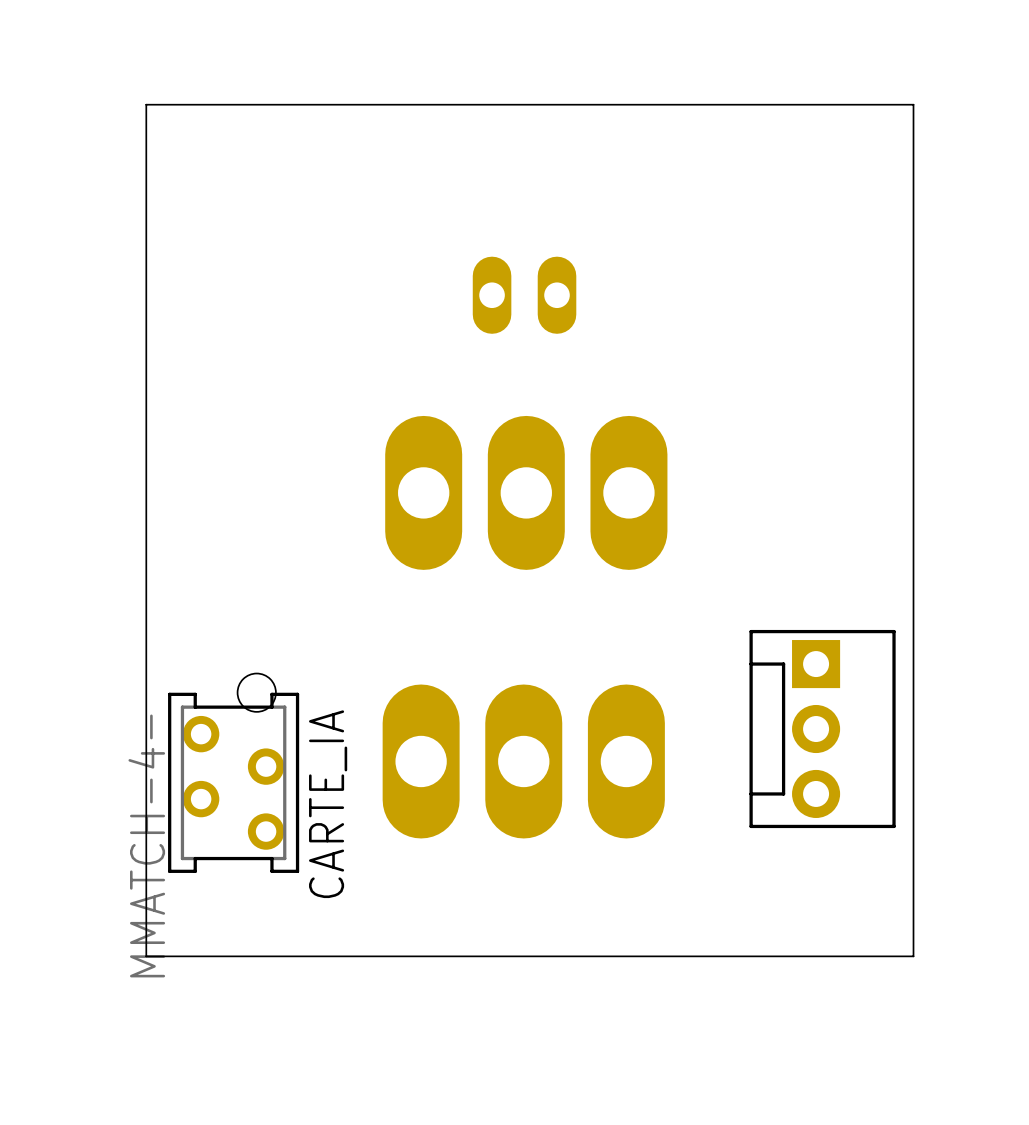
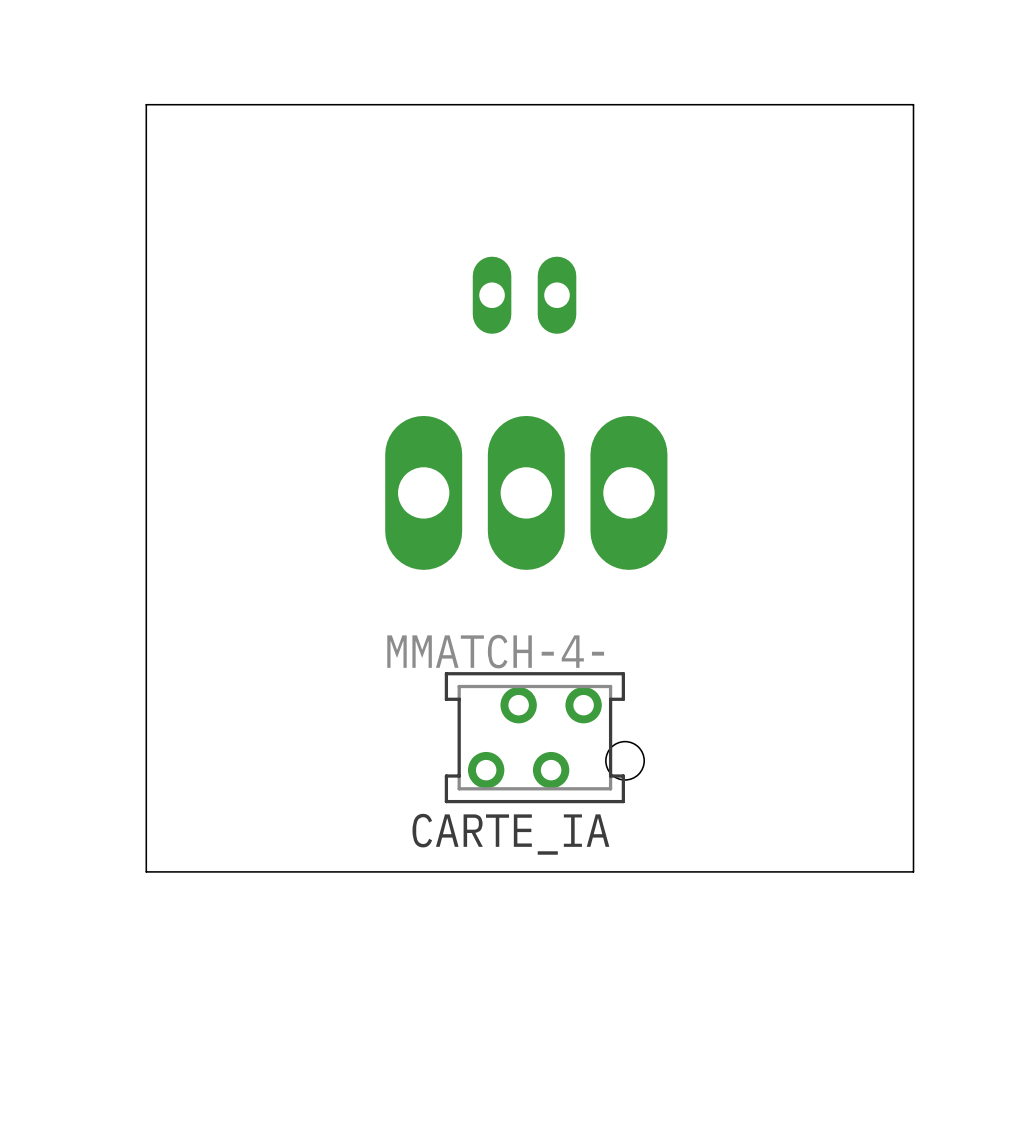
part: (822, 729) -> none
part: (523, 761) -> none
CARTE_IA rotation: 0° (233, 773) -> 90° clockwise (544, 737)
CARTE_IA position: (233, 773) -> (544, 737)
board edge: (913, 871) (913, 956) (146, 956) (146, 871) -> (913, 871) (146, 871)

